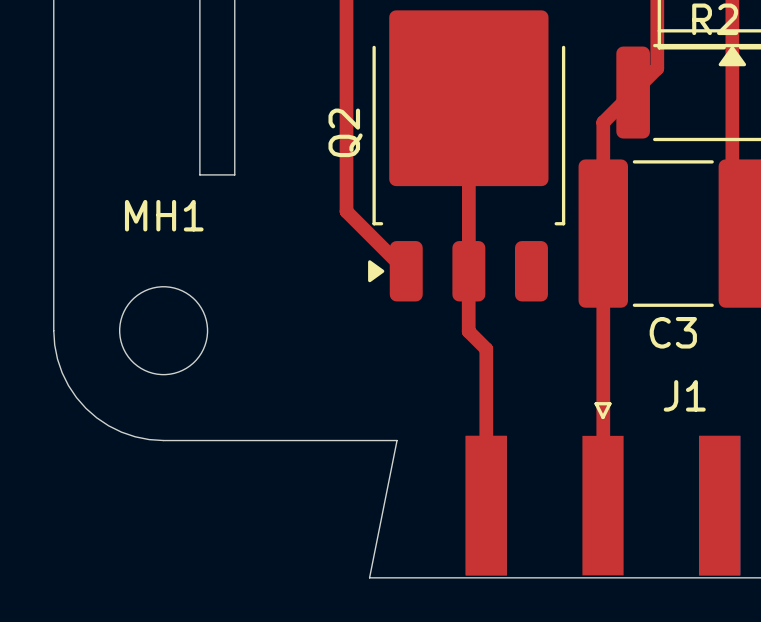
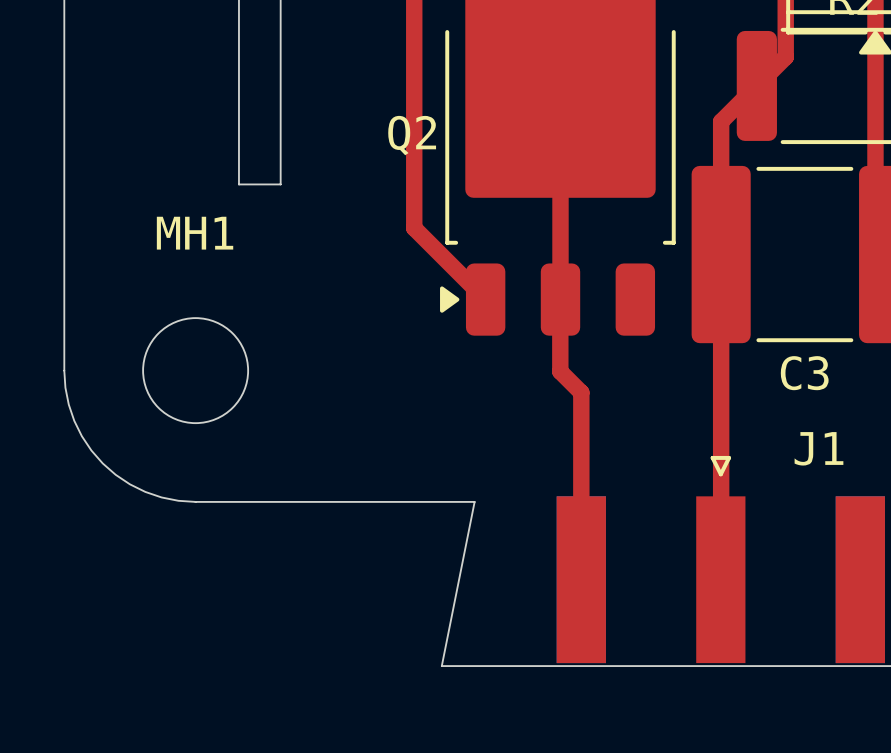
Q2 name rotation: 0° (345, 132) -> 90° clockwise (412, 135)

